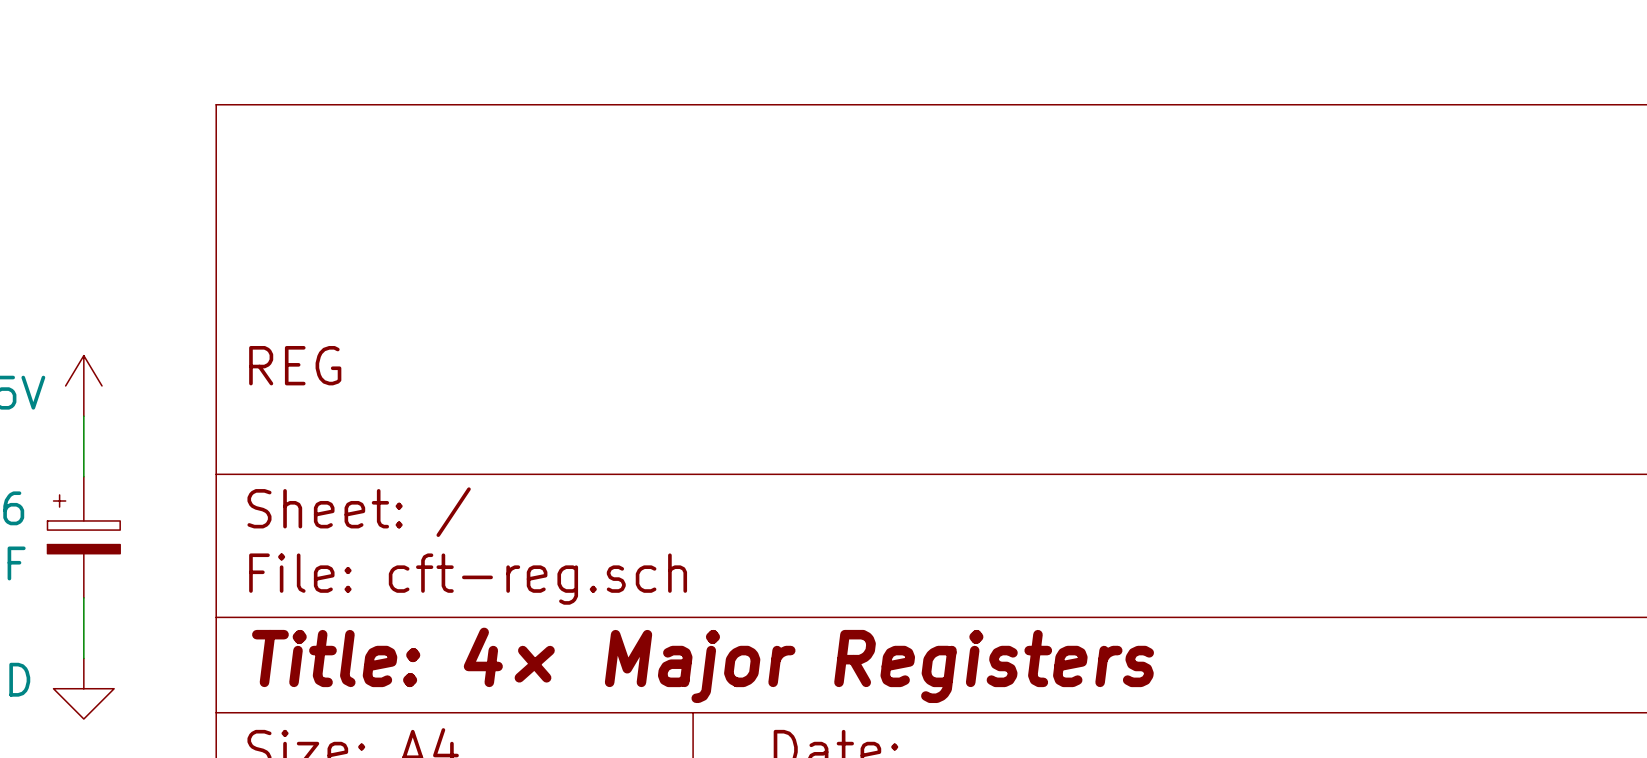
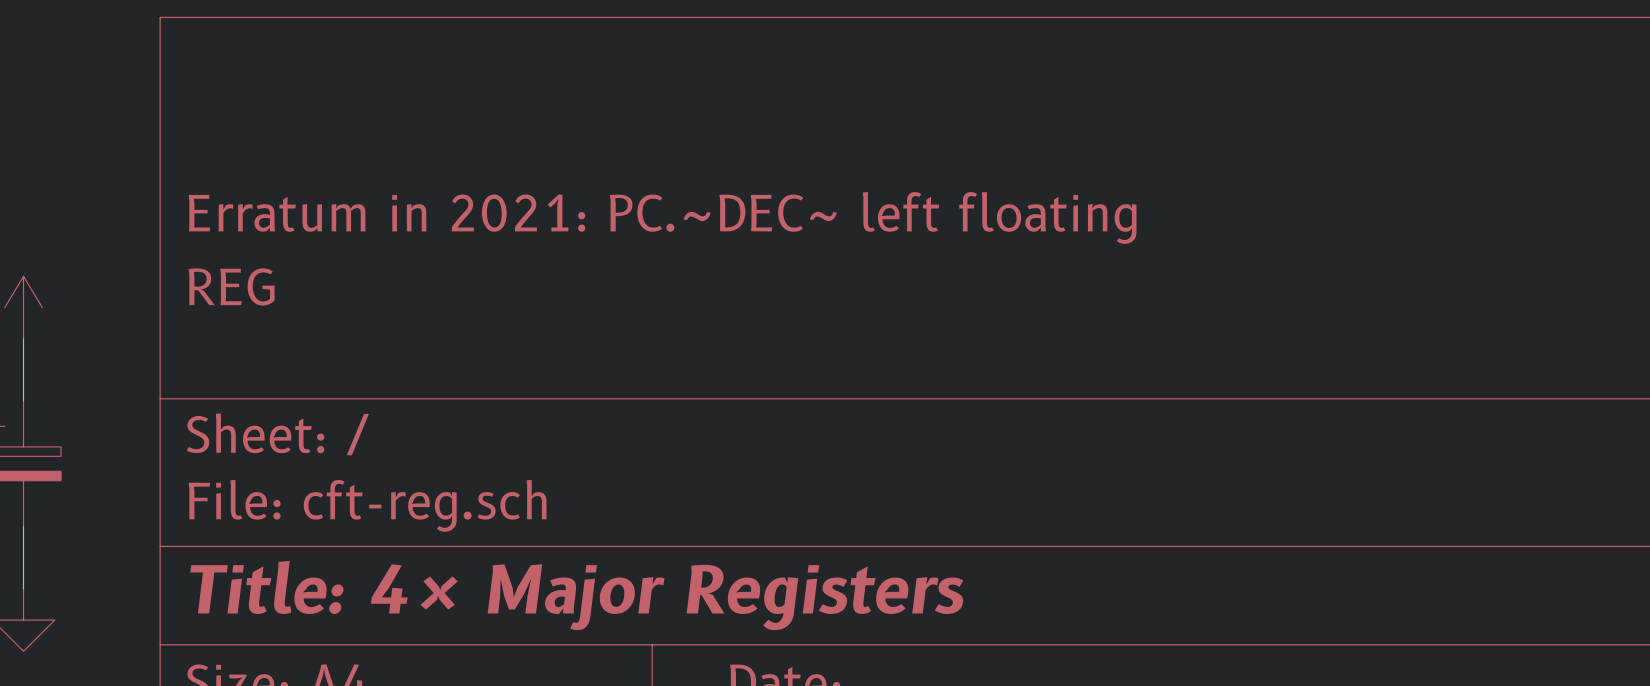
title block: none -> Erratum in 2021: PC.~DEC~ left floating (662, 217)

